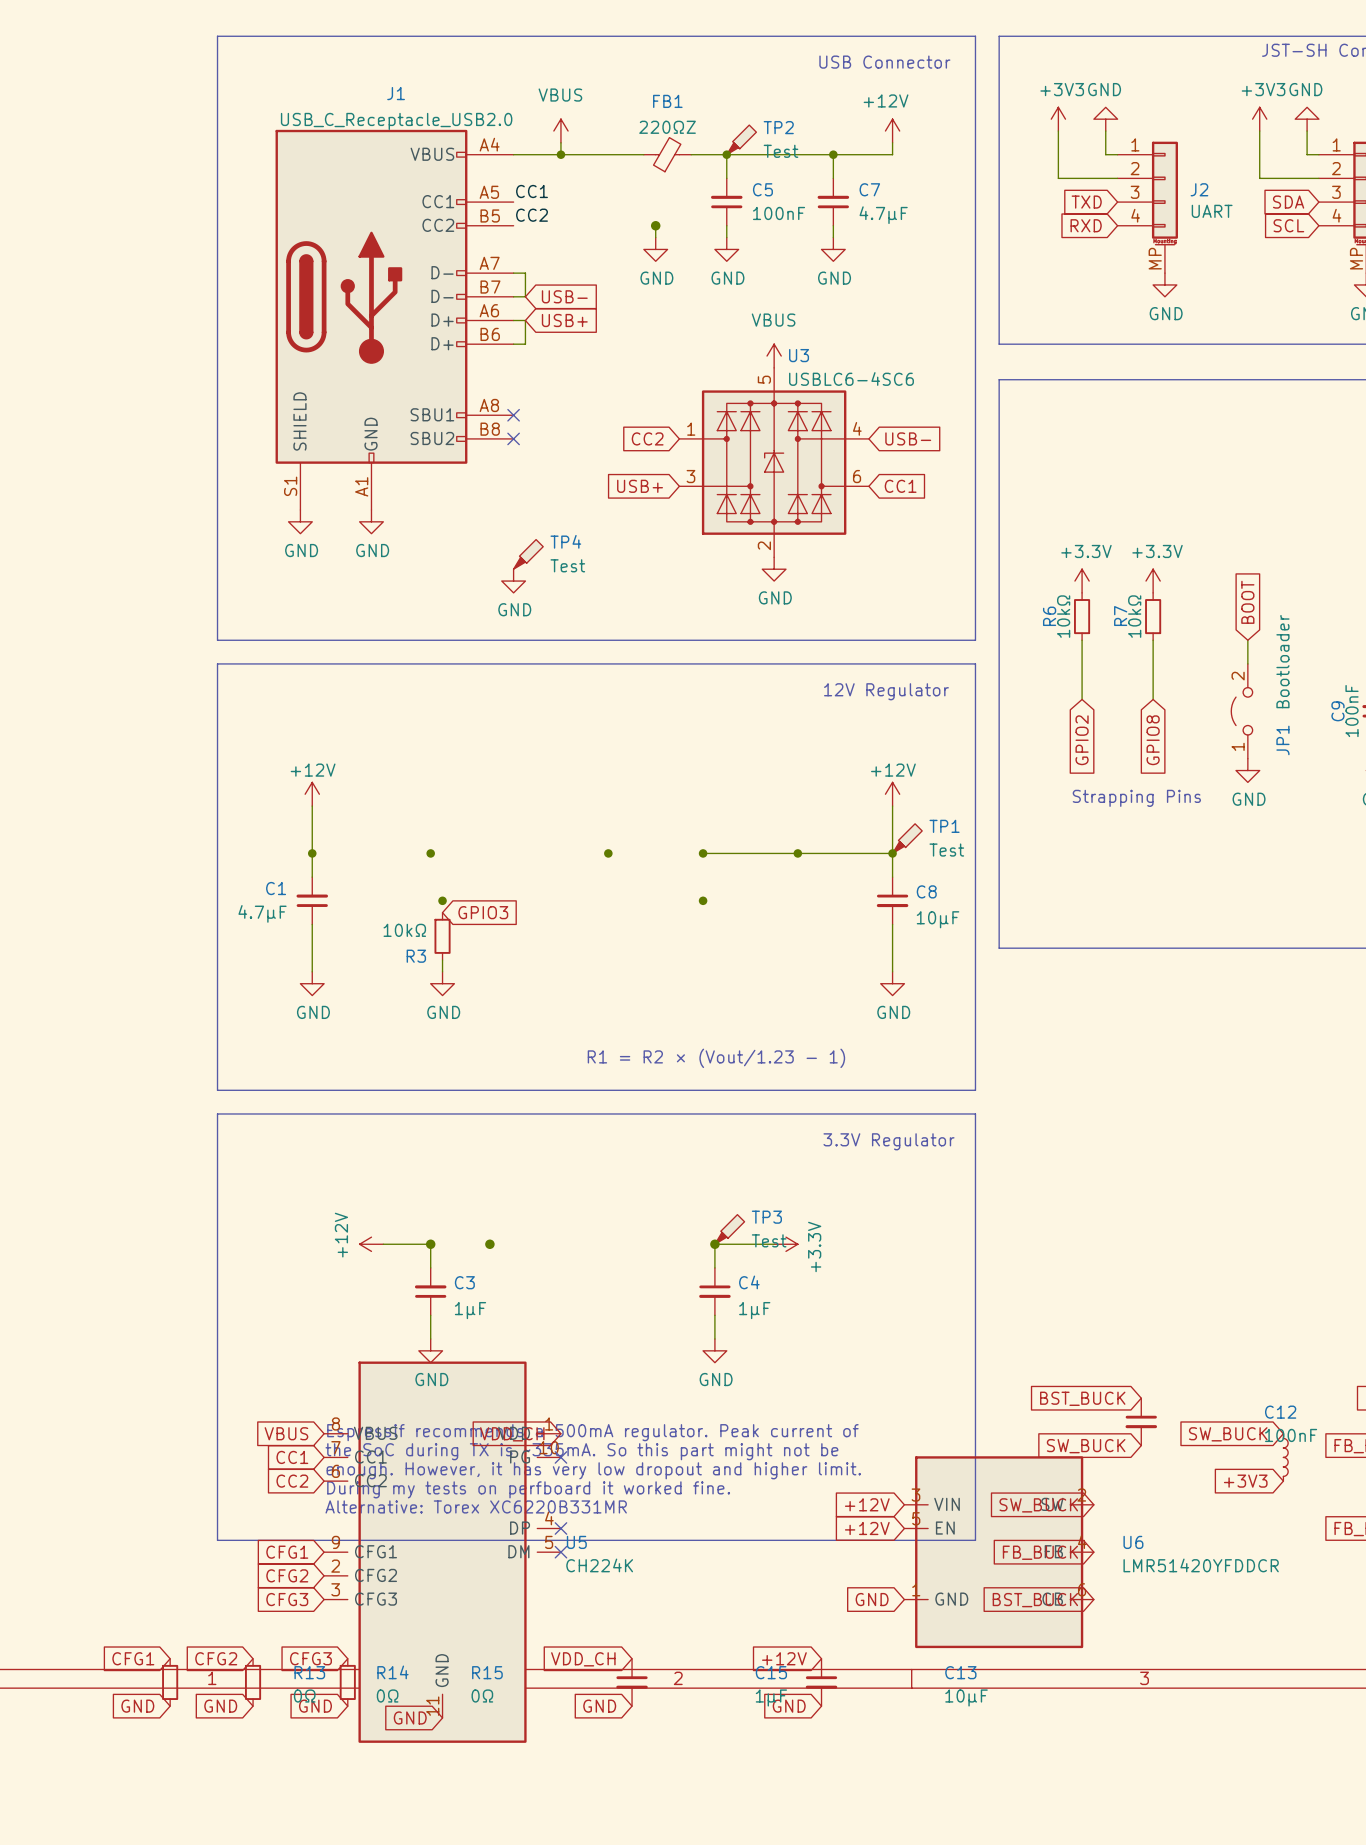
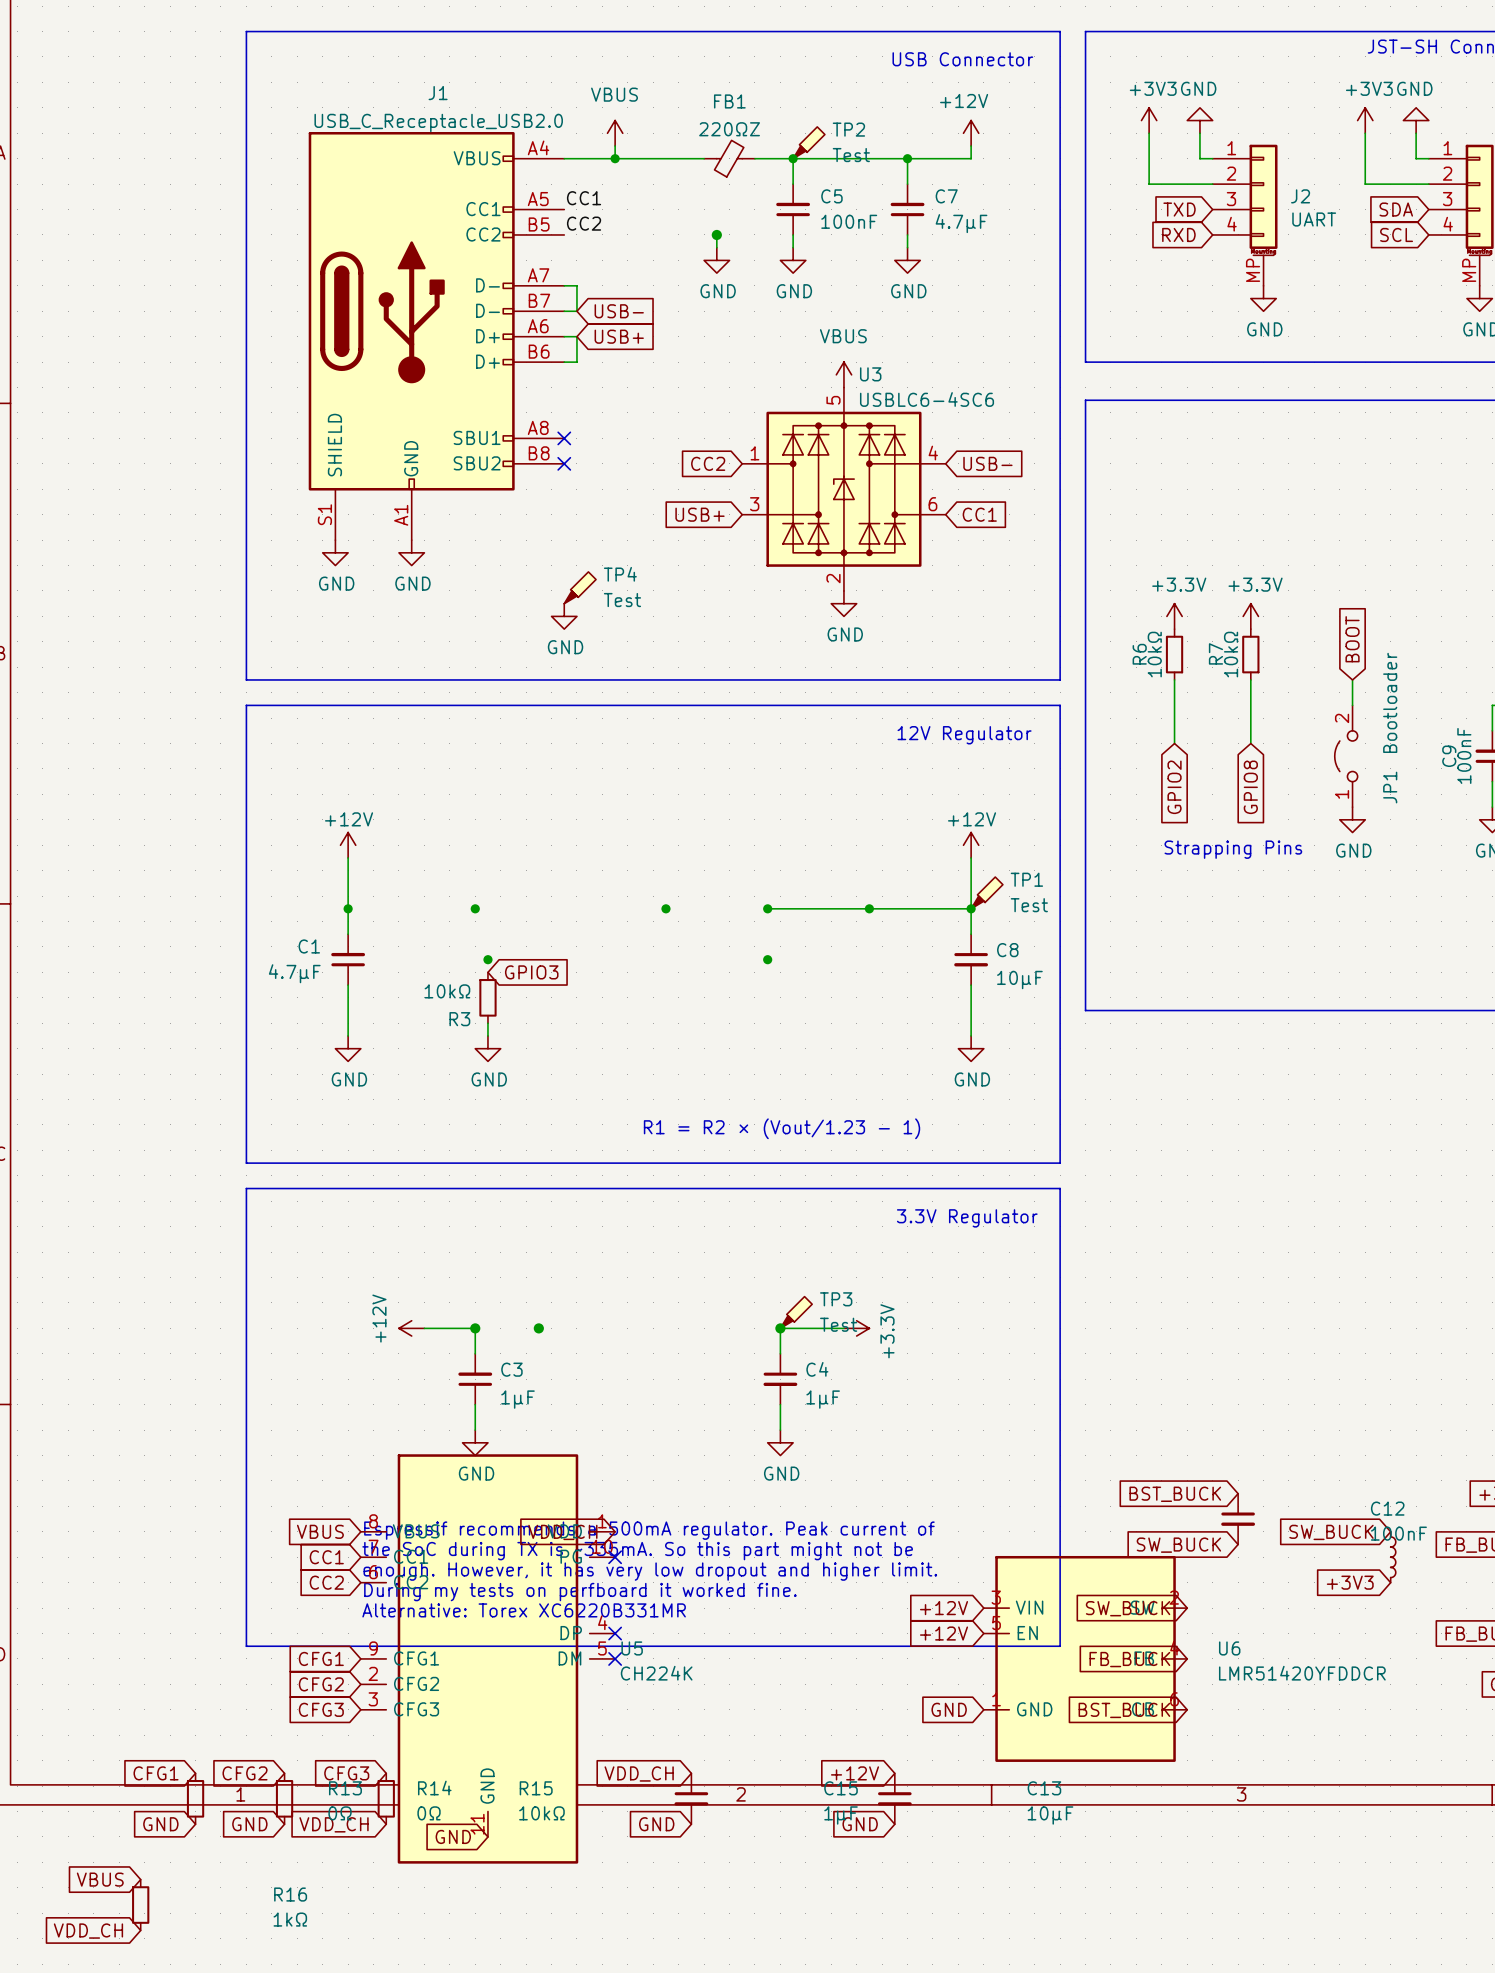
R15 value: 0Ω (482, 1696) -> 10kΩ (541, 1813)
global label: GND (315, 1706) -> VDD_CH (334, 1824)
global label: none -> VBUS (100, 1879)
R16: none -> 1kΩ (140, 1905)
global label: none -> VDD_CH (88, 1931)

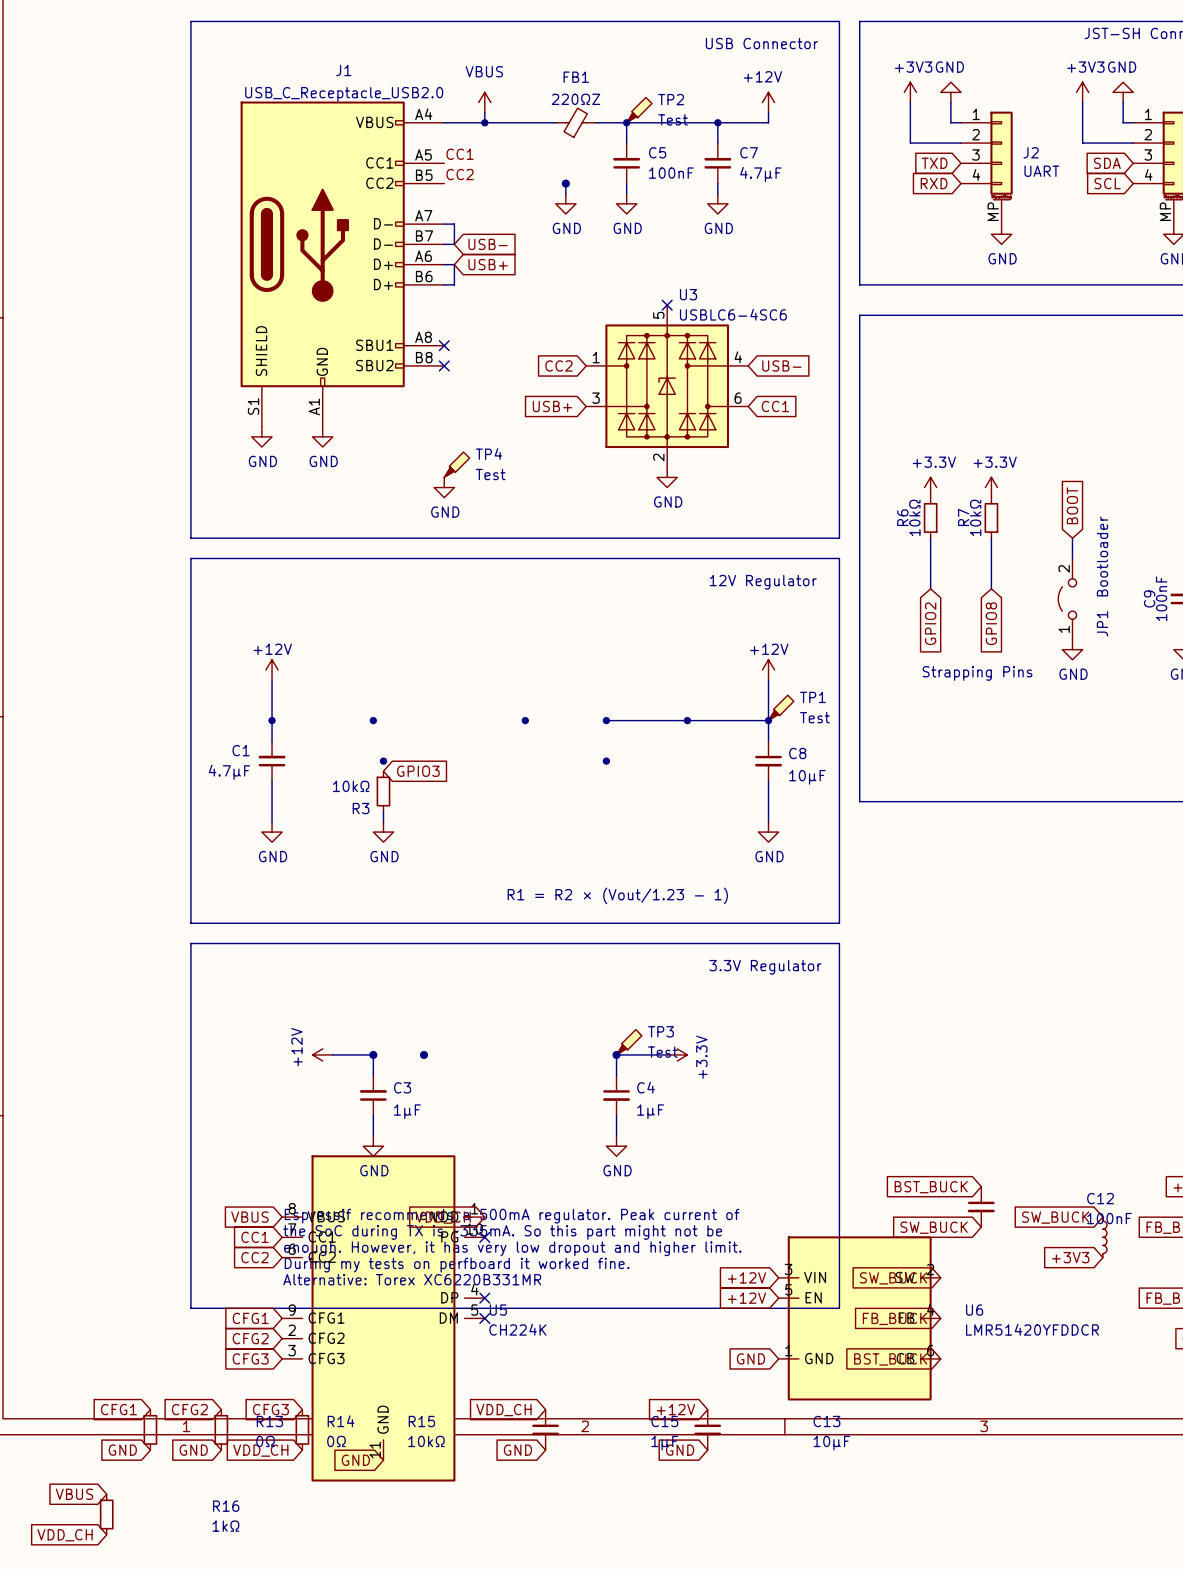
power symbol: VBUS (843, 374) -> none
no-connect mark: none -> (667, 305)

